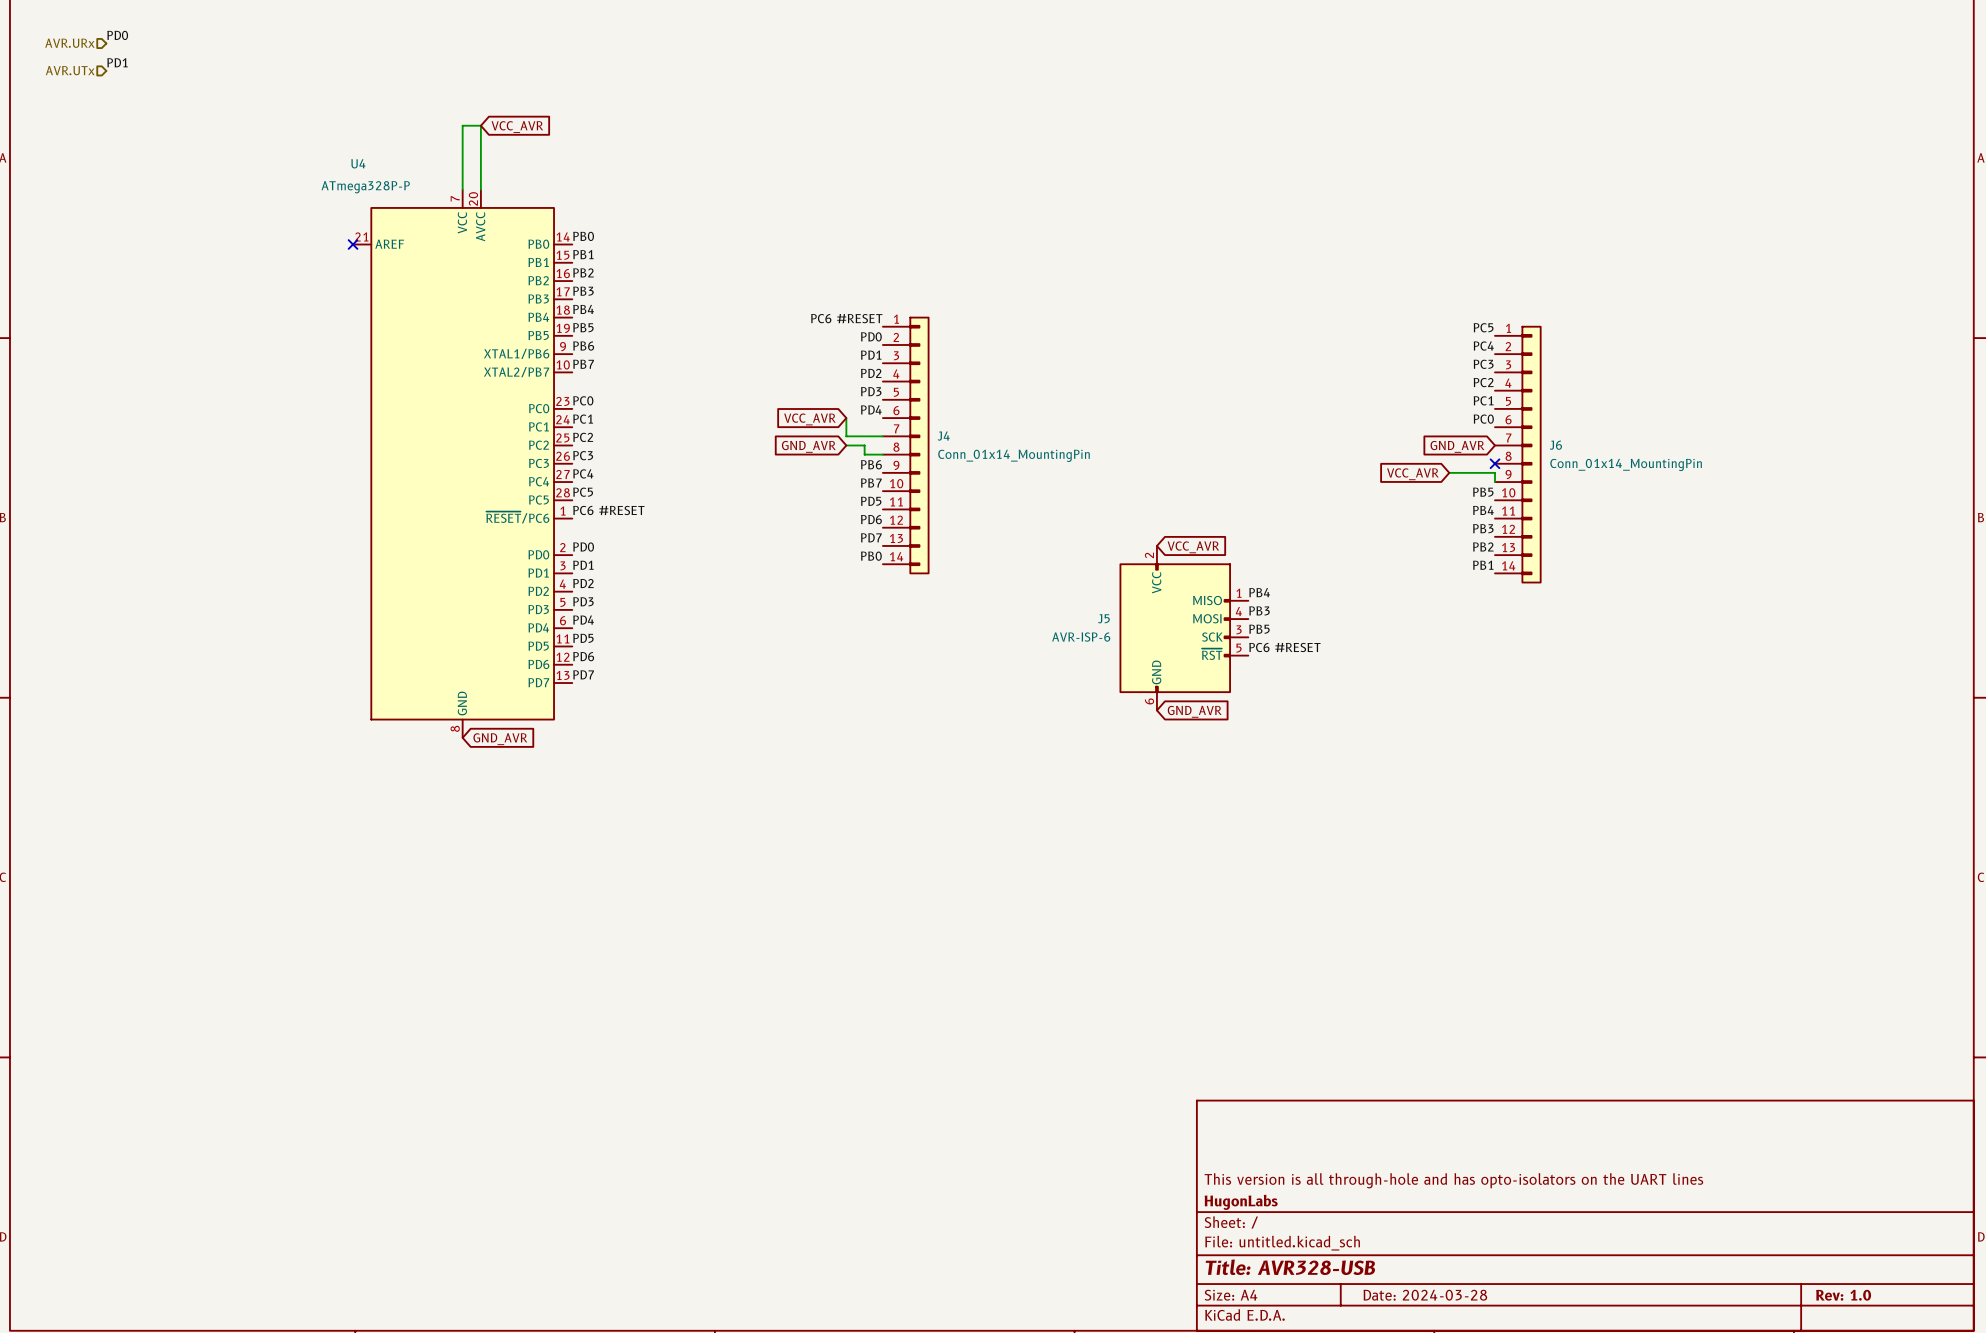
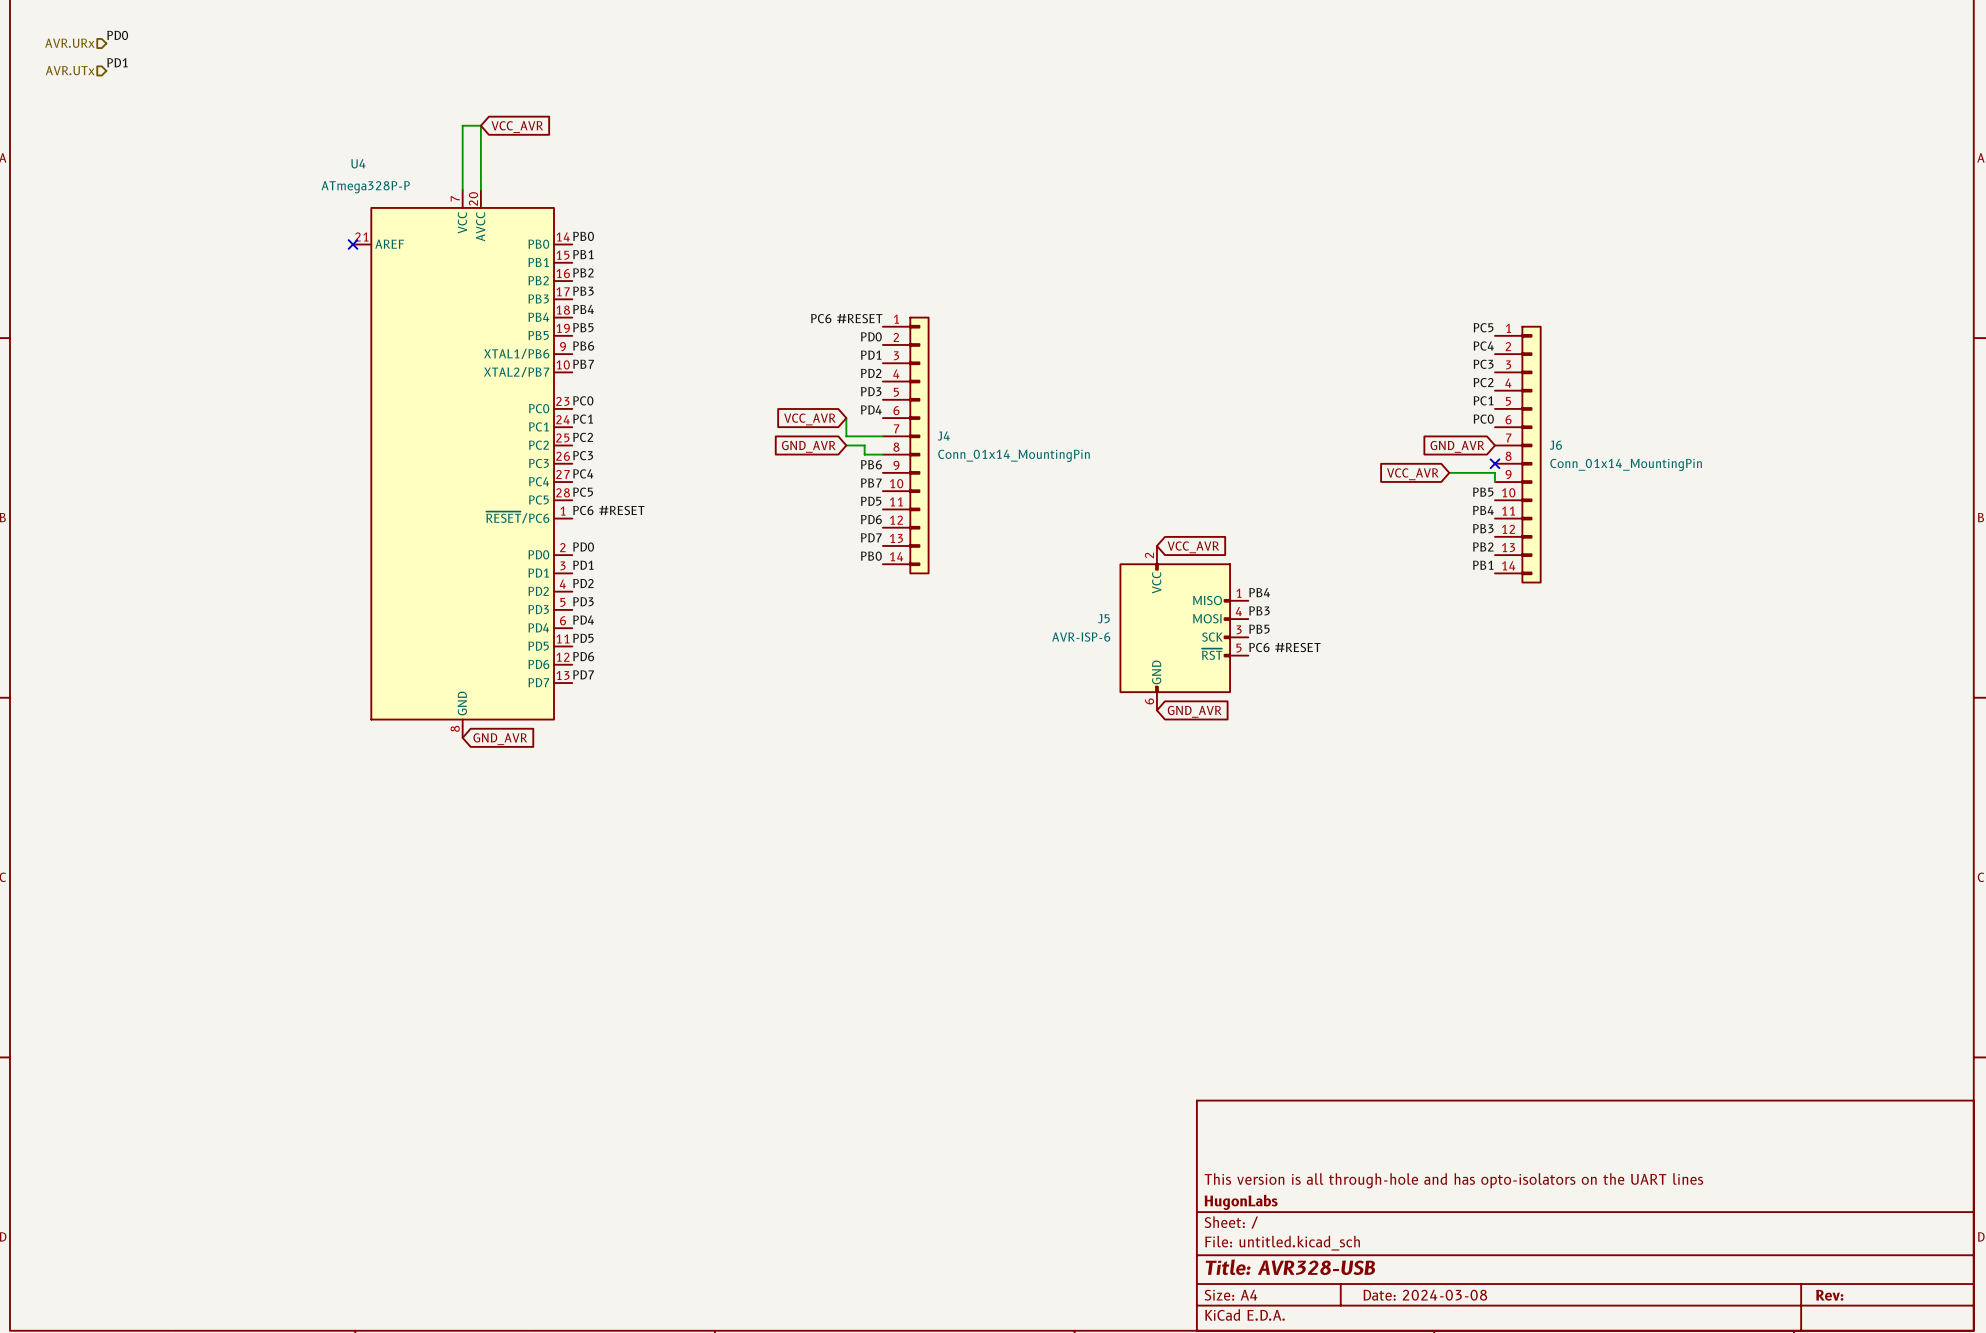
title block: Date: 2024-03-28 (1425, 1295) -> Date: 2024-03-08 (1425, 1295)
title block: Rev: 1.0 (1843, 1295) -> Rev: (1829, 1295)

